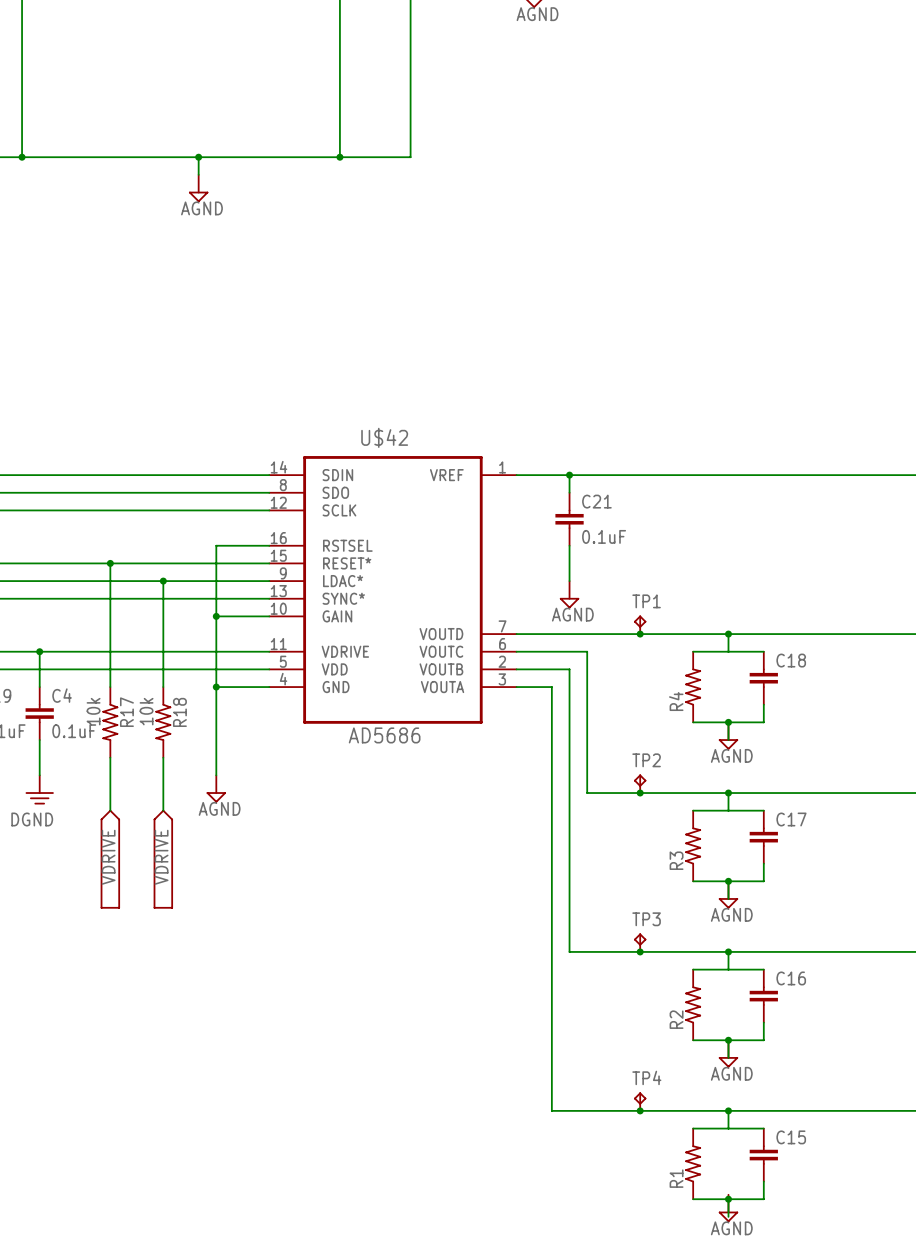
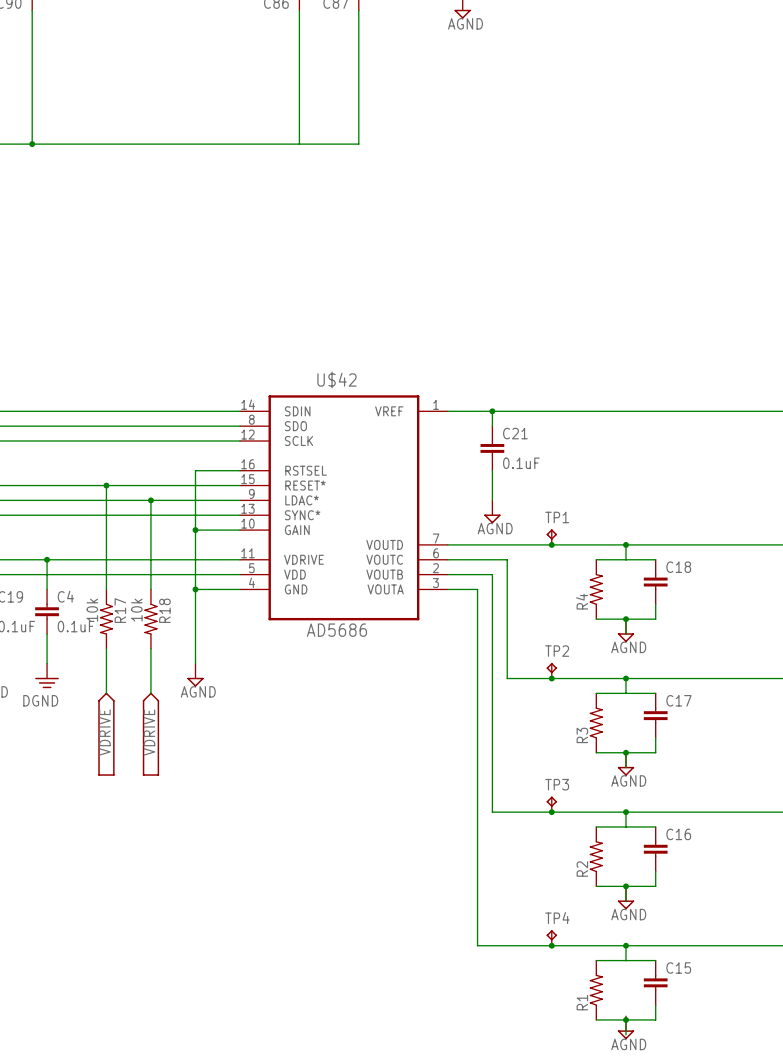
wire: (198, 157) (198, 174) -> none
junction: (198, 157) -> none
junction: (339, 157) -> none
power symbol: AGND (198, 188) -> none

